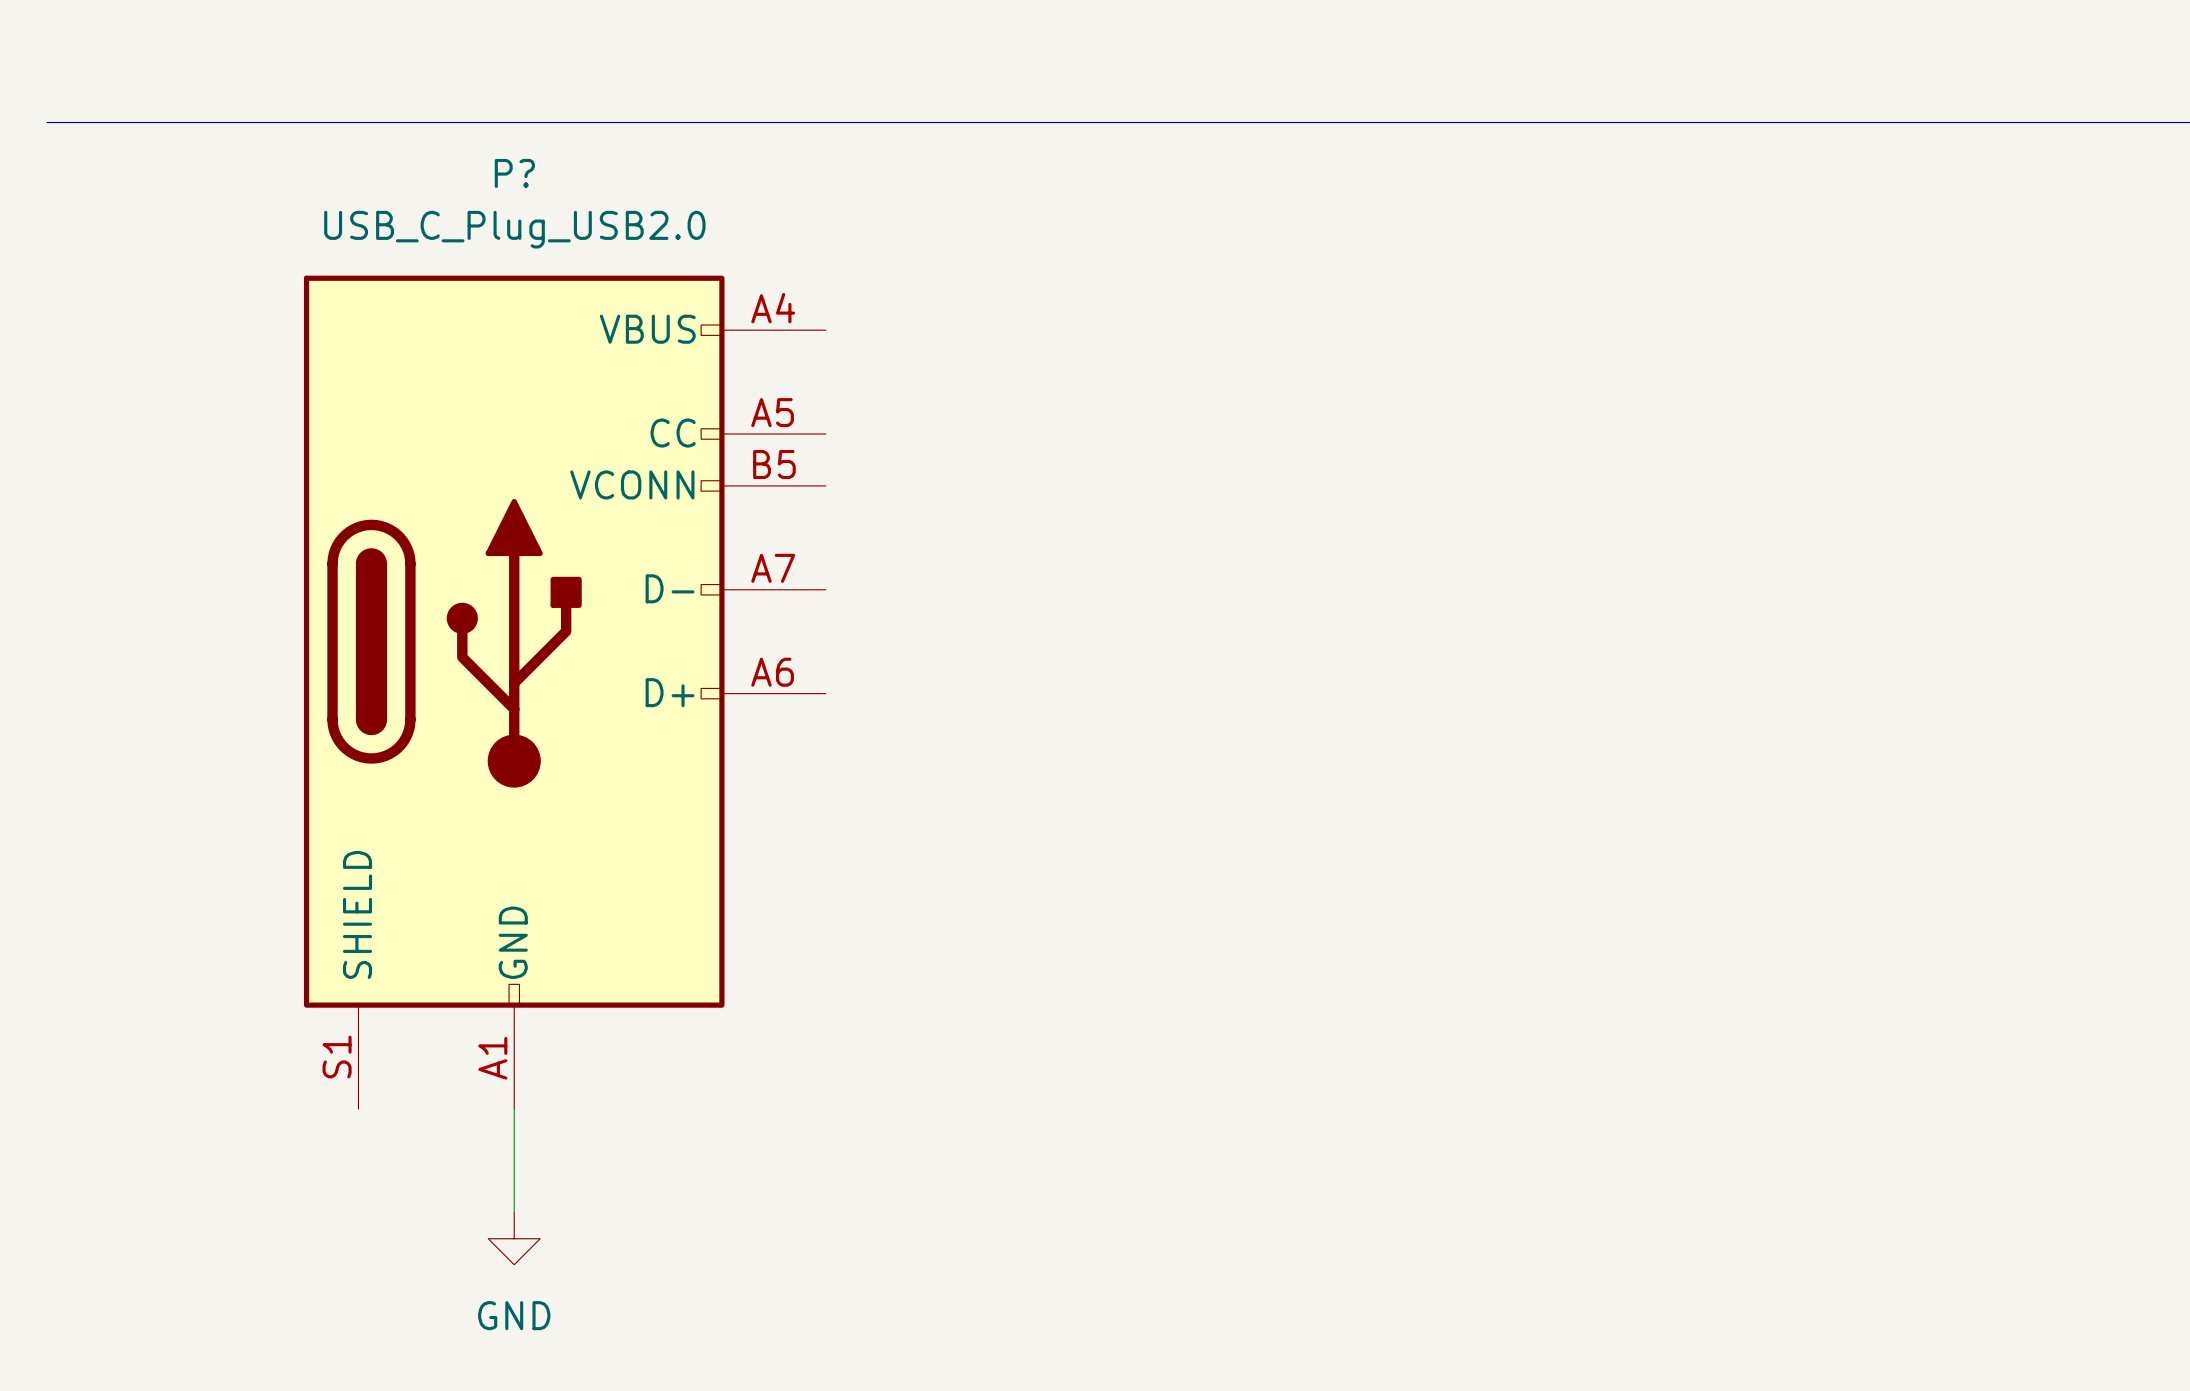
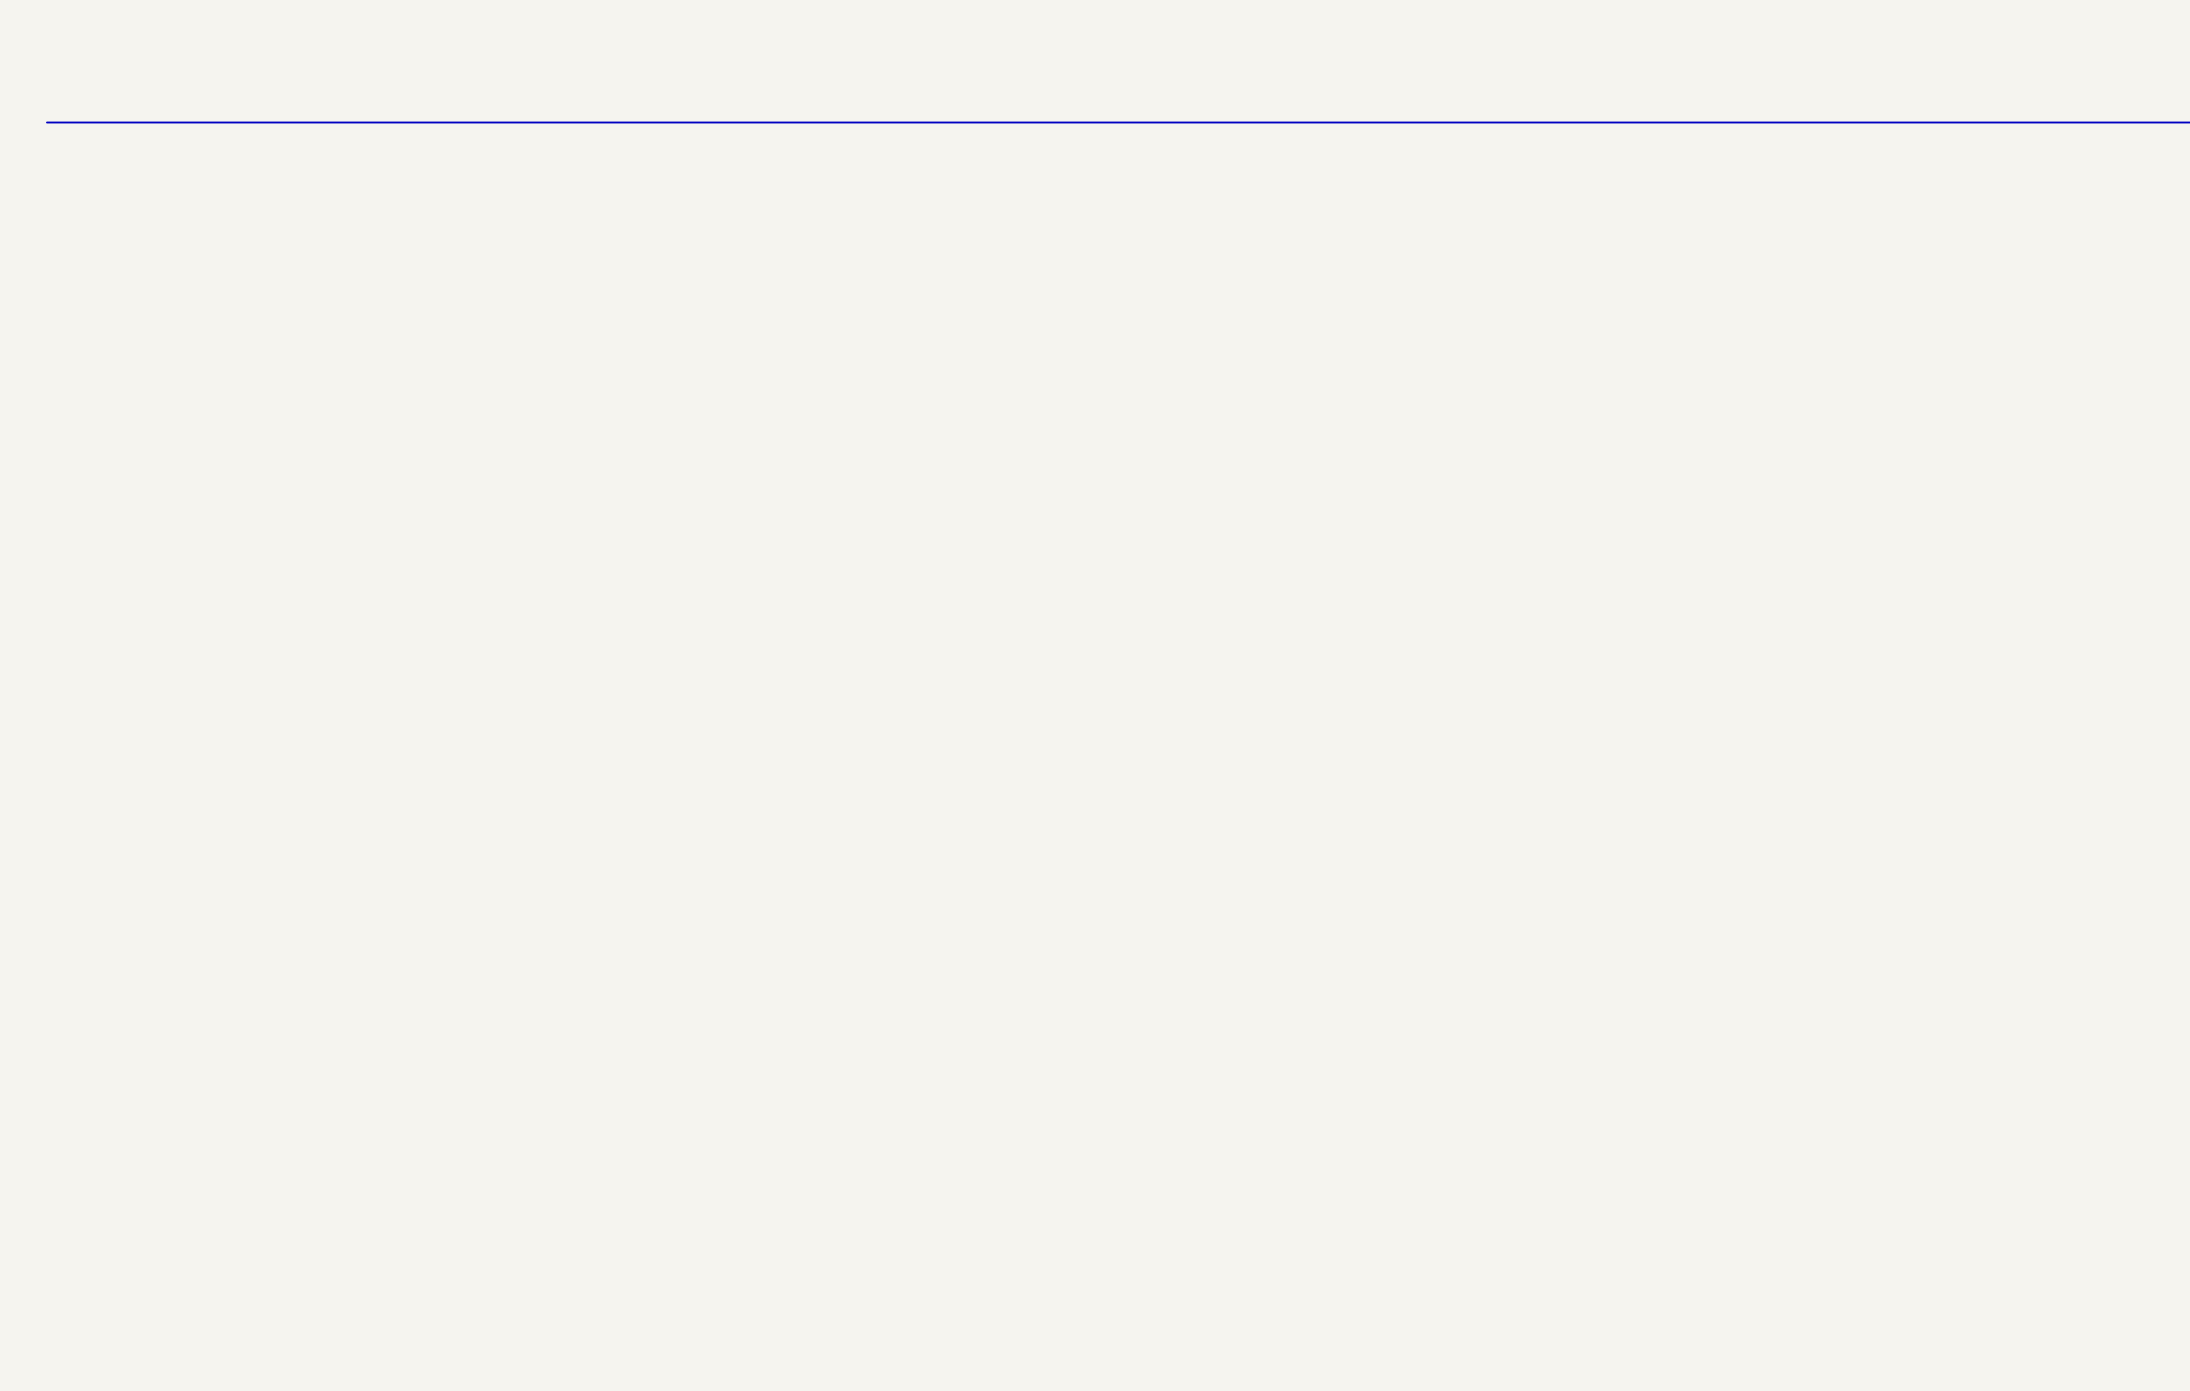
P?: USB_C_Plug_USB2.0 (564, 692) -> none
wire: (514, 1108) (514, 1212) -> none
power symbol: GND (514, 1238) -> none

